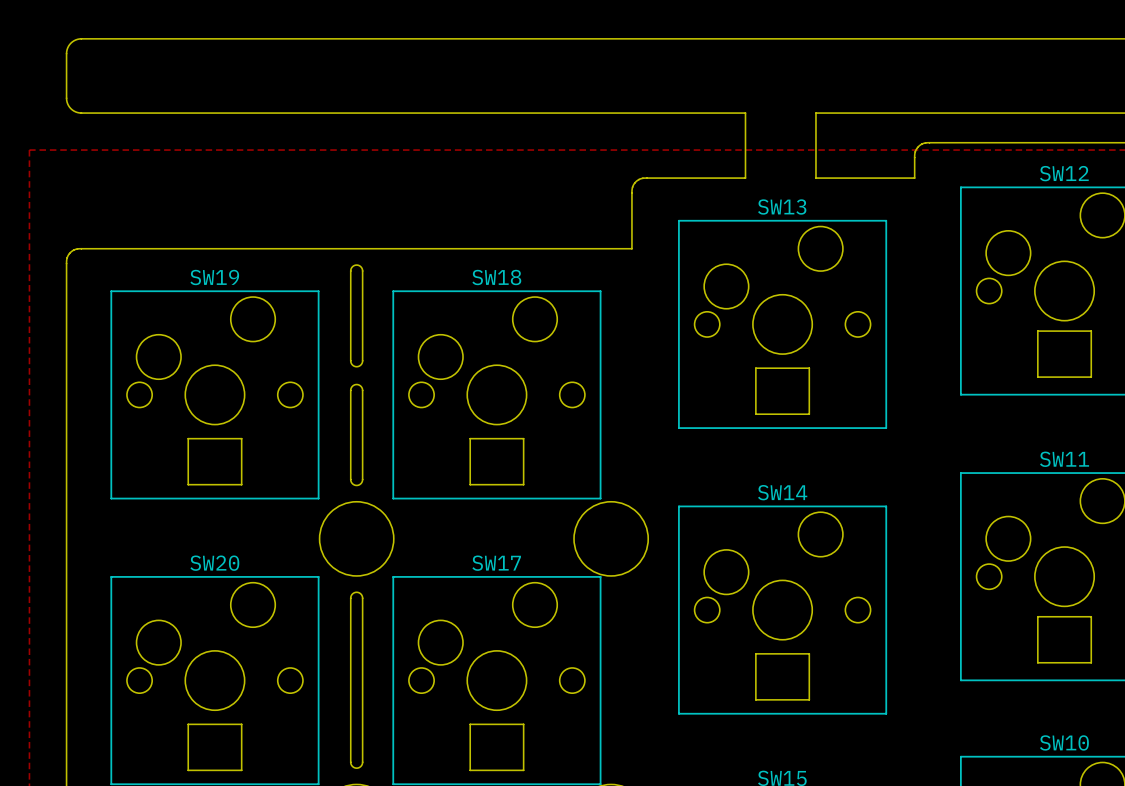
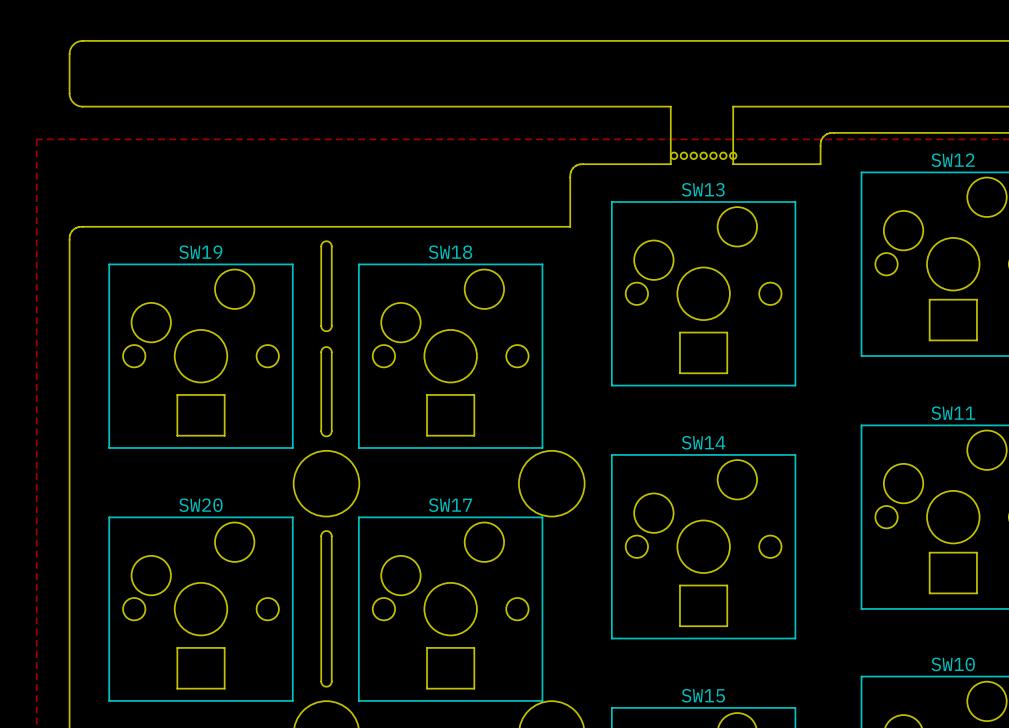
part: none -> (674, 155)
part: none -> (683, 155)
part: none -> (693, 155)
part: none -> (703, 155)
part: none -> (713, 155)
part: none -> (723, 155)
part: none -> (733, 155)

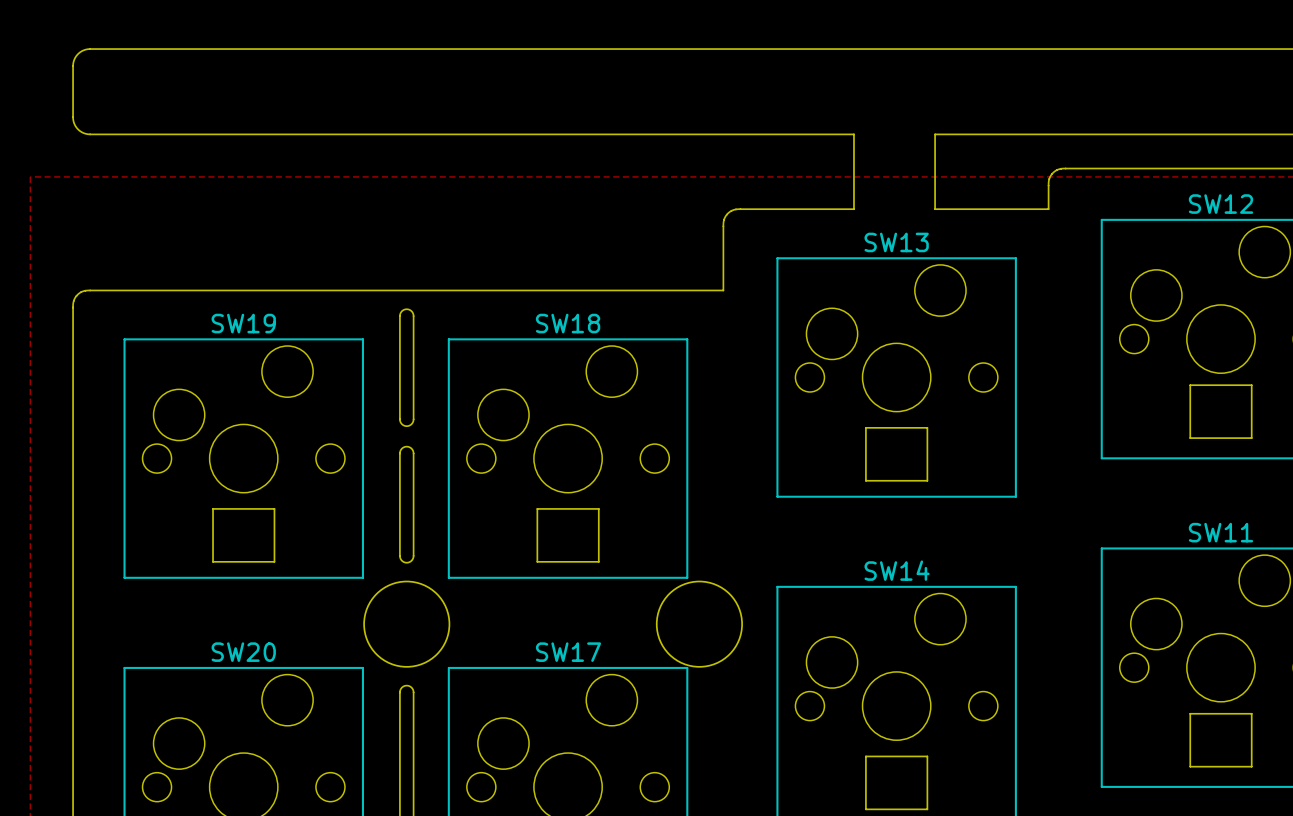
part: (674, 155) -> none
part: (683, 155) -> none
part: (693, 155) -> none
part: (703, 155) -> none
part: (713, 155) -> none
part: (723, 155) -> none
part: (733, 155) -> none

